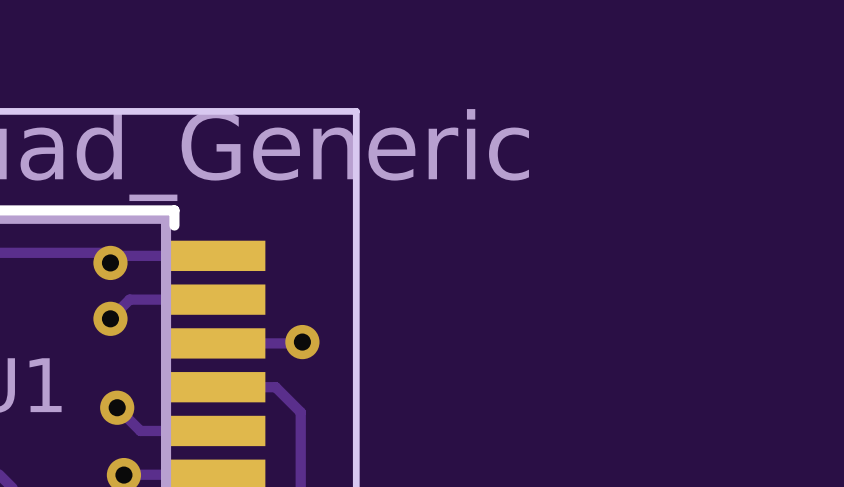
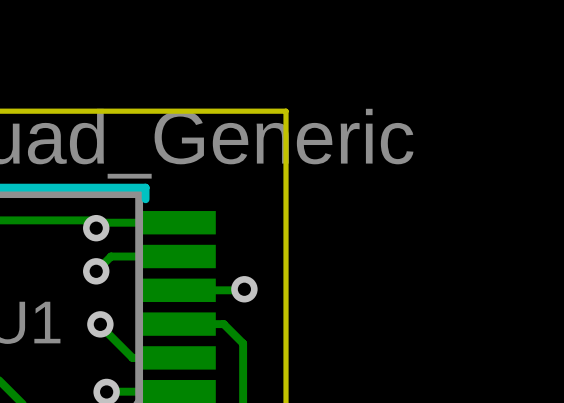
track: (117, 407) (140, 430) (157, 430) -> (100, 324) (132, 357)
via position: (117, 407) -> (100, 324)

